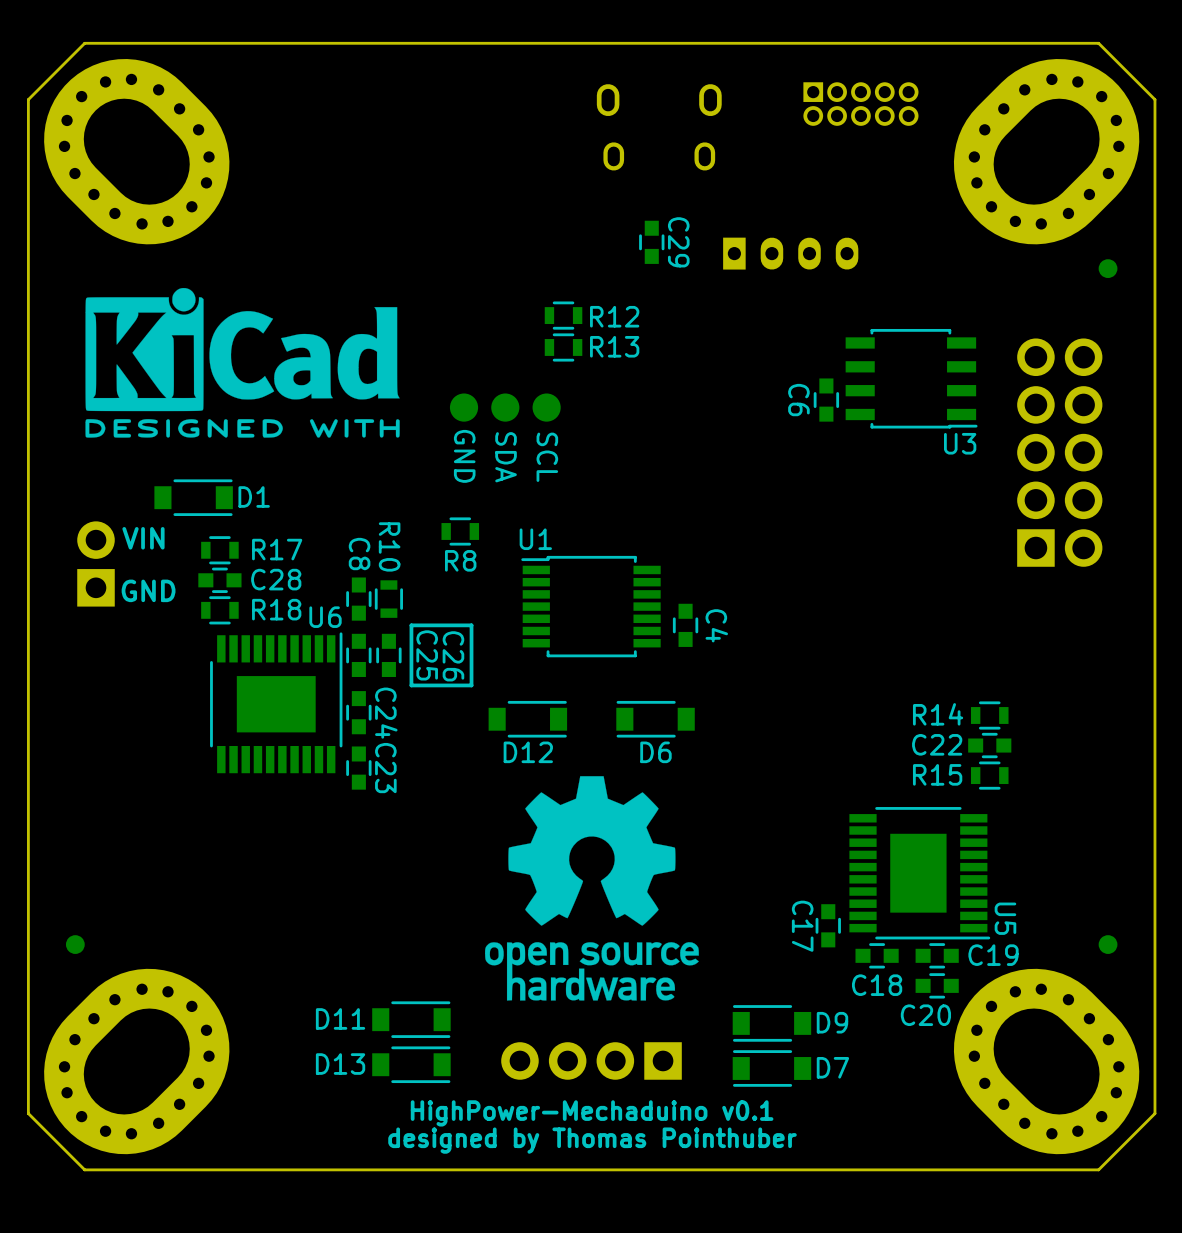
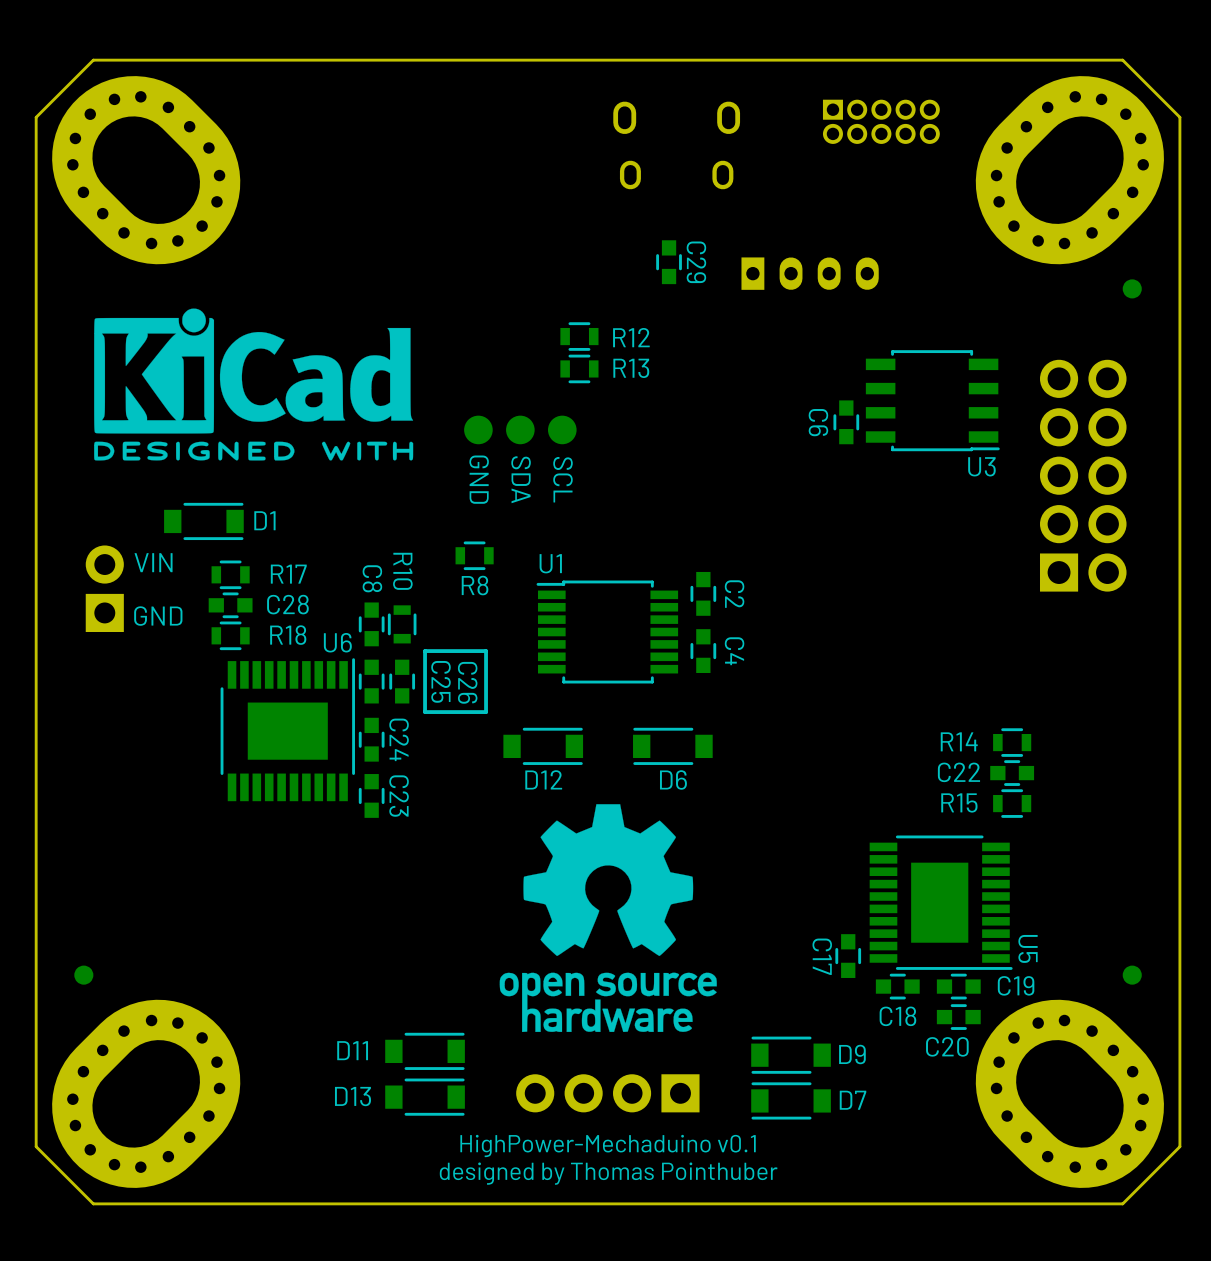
C2: none -> (703, 593)

